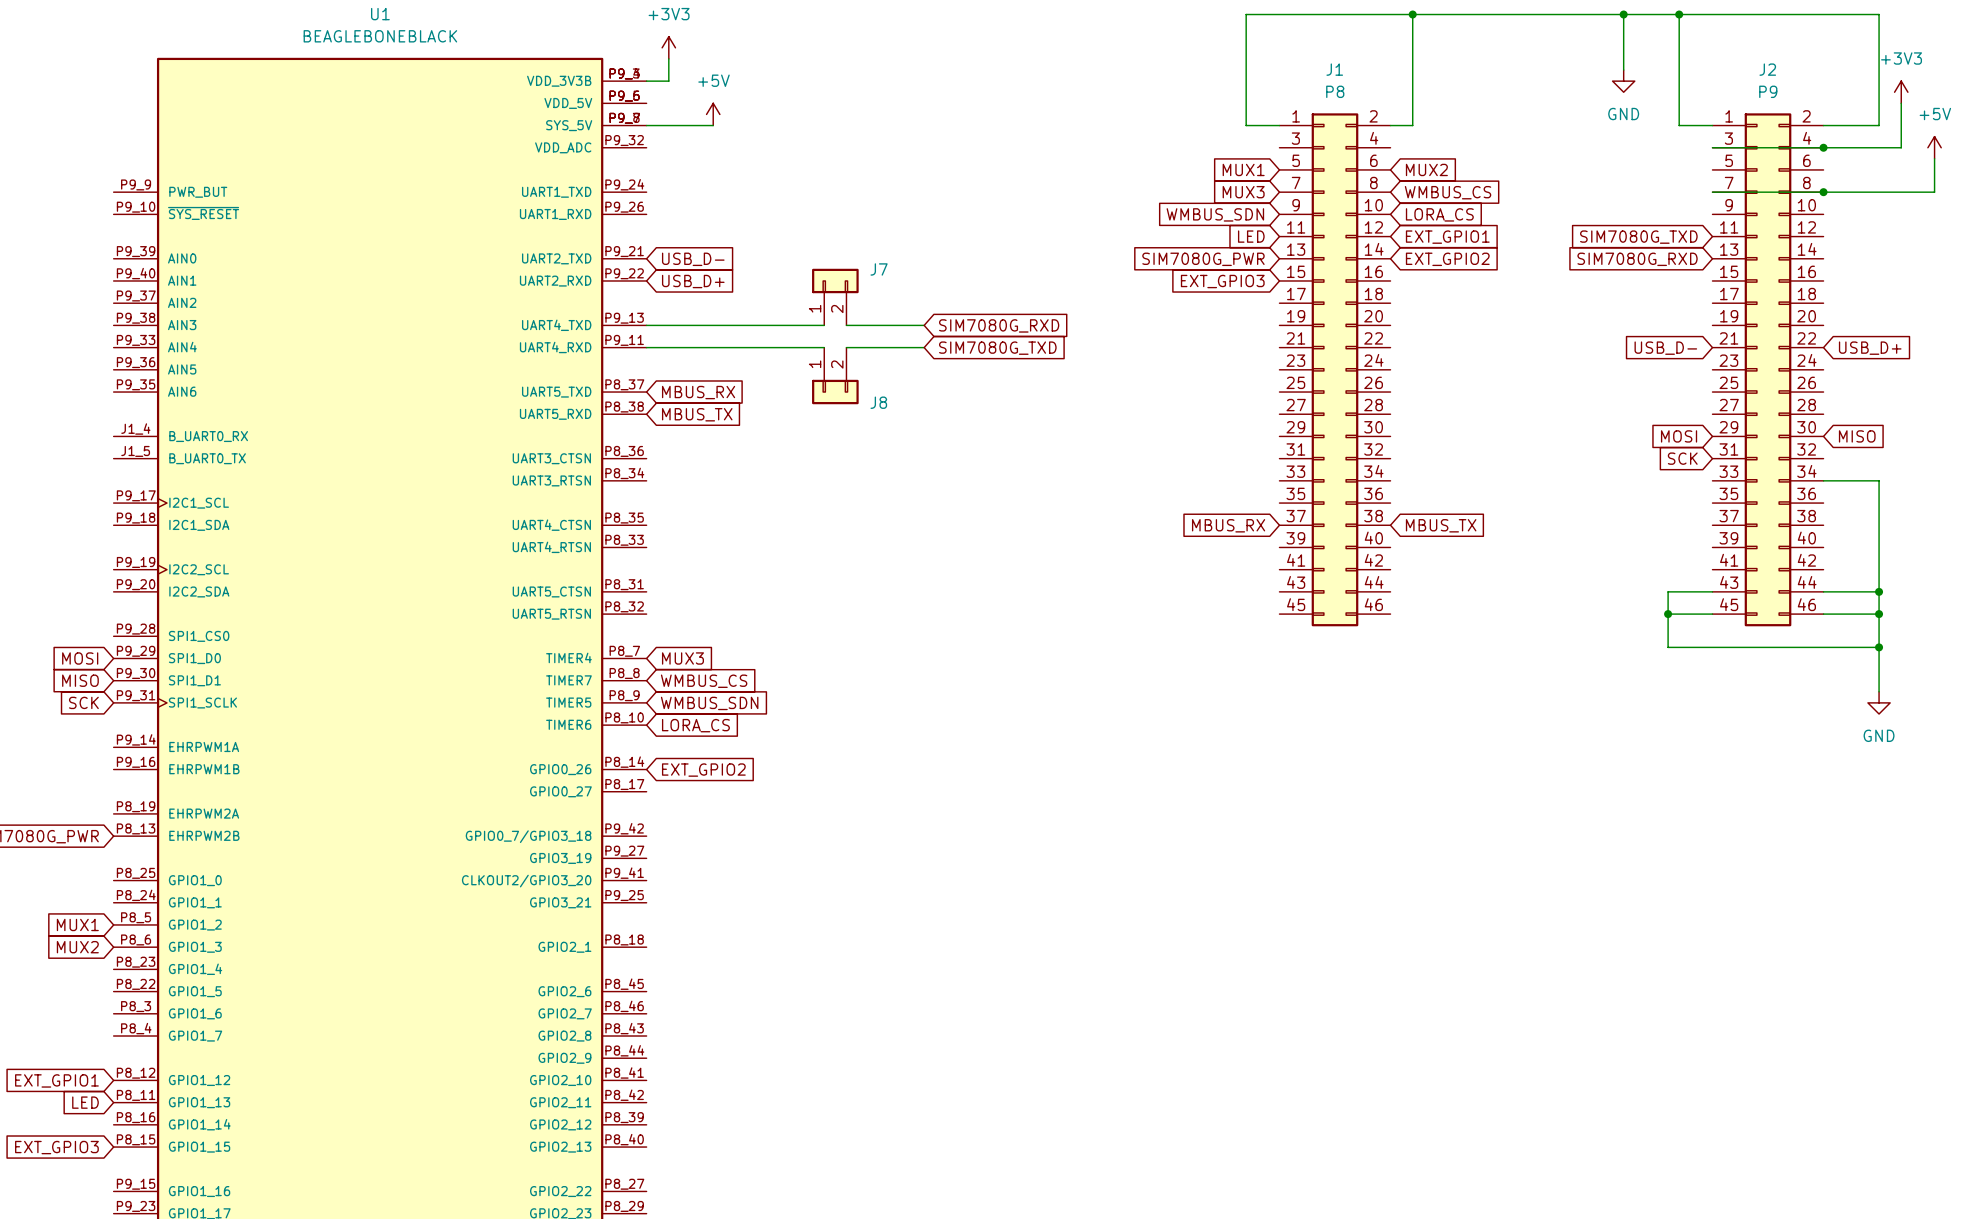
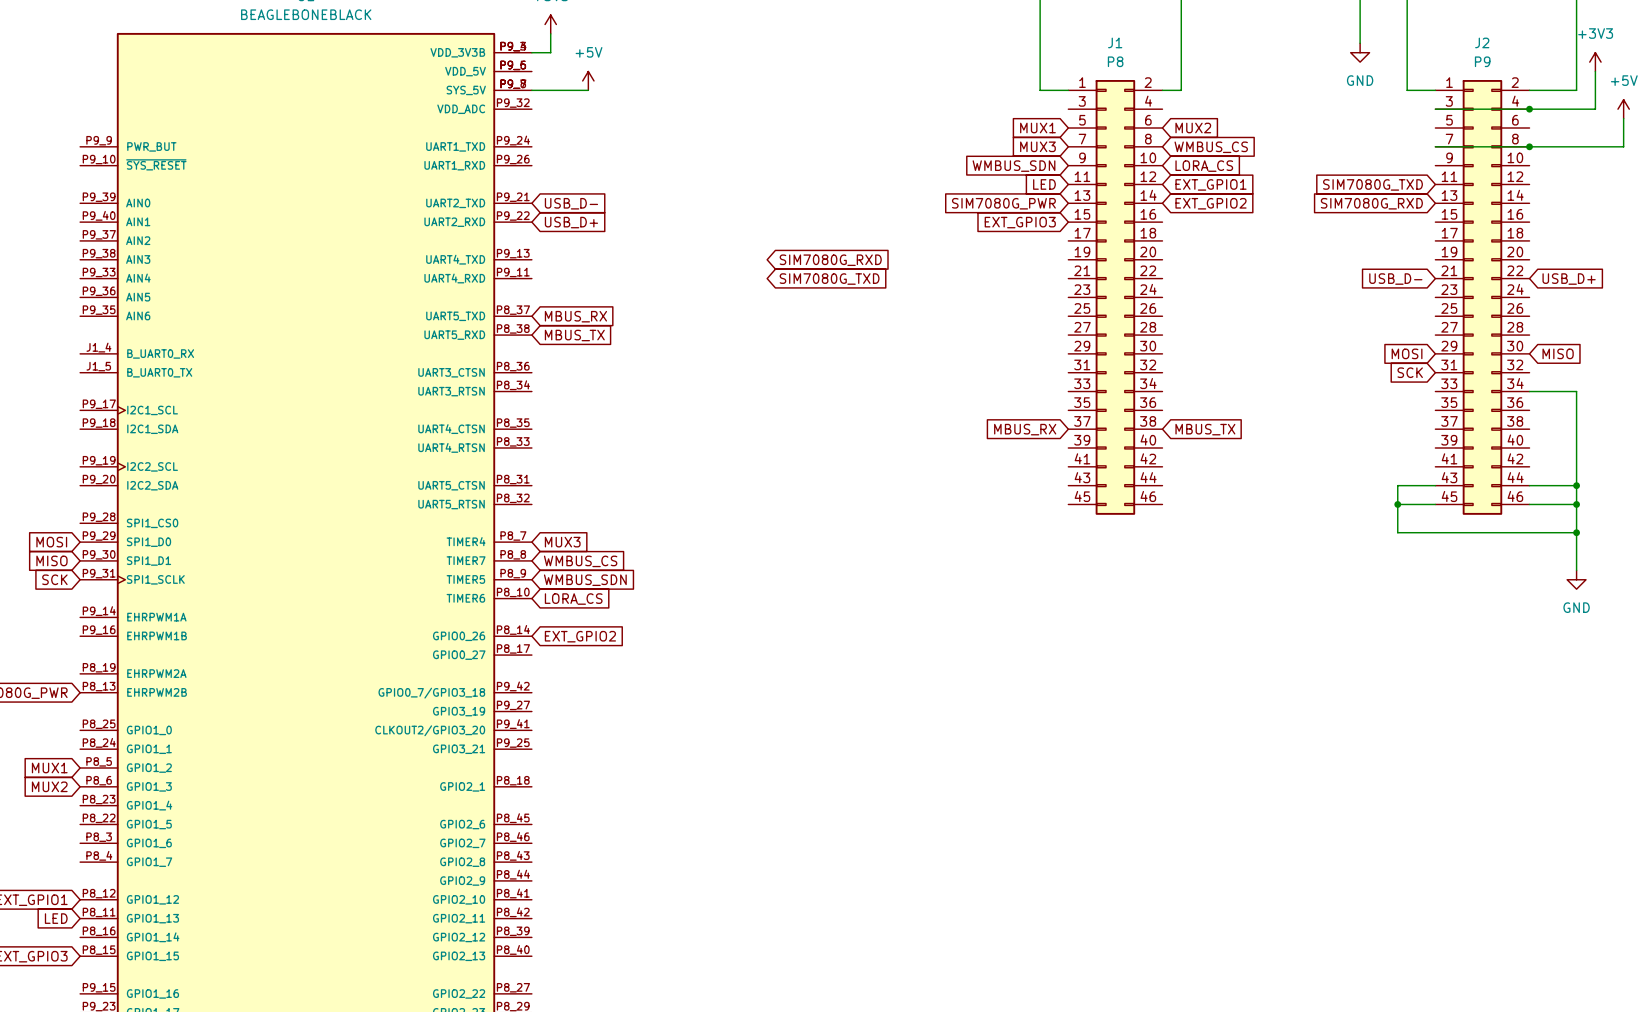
J7: (835, 297) -> none
wire: (646, 325) (824, 325) -> none
wire: (846, 325) (924, 325) -> none
wire: (646, 347) (824, 347) -> none
wire: (846, 347) (924, 347) -> none
J8: (835, 375) -> none

